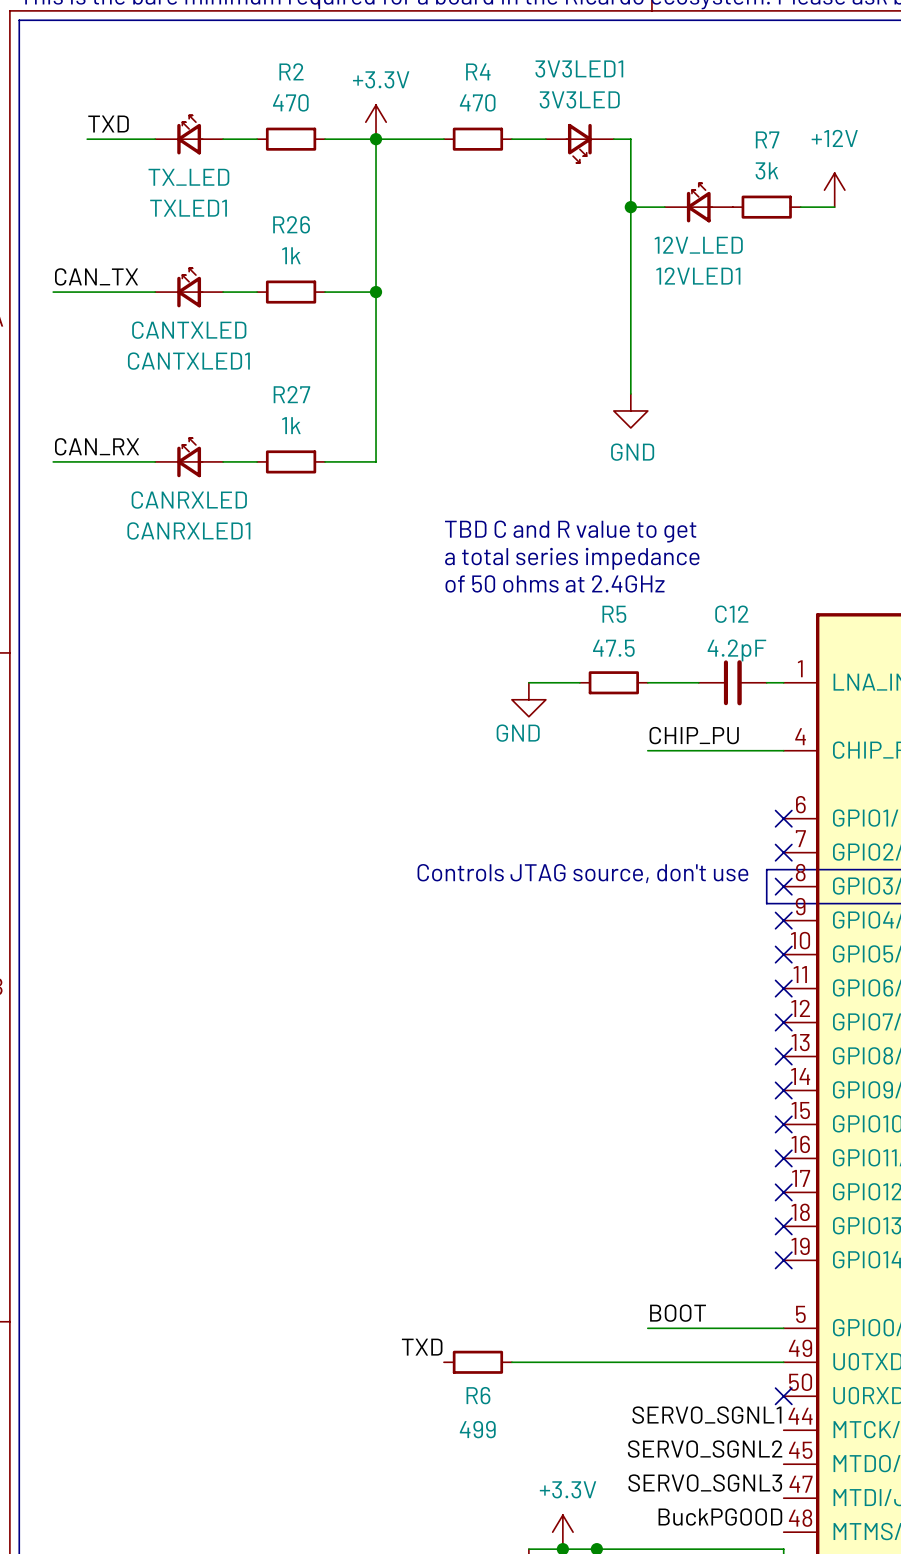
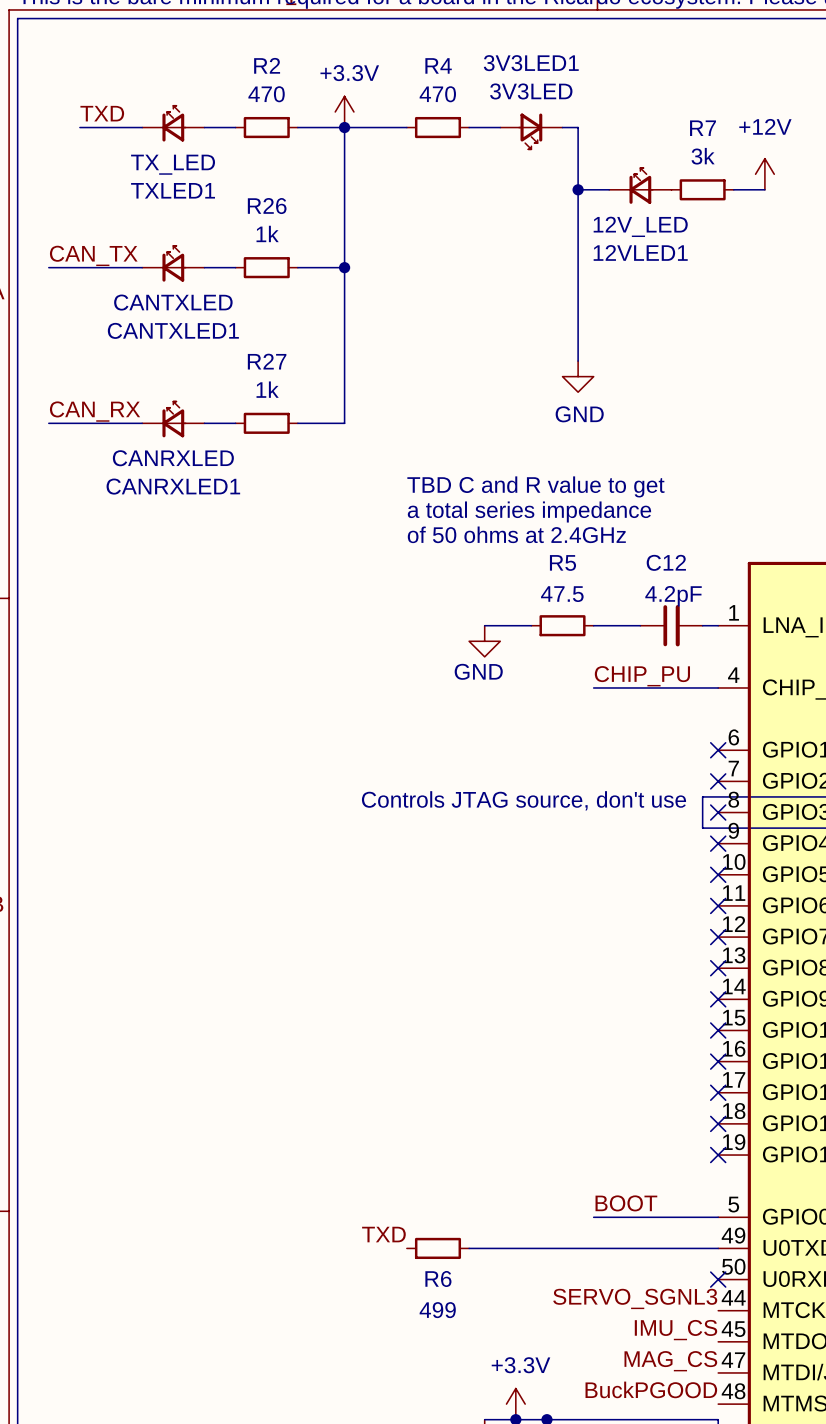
label: SERVO_SGNL1 (706, 1415) -> SERVO_SGNL3 (635, 1298)
label: SERVO_SGNL2 (705, 1449) -> IMU_CS (675, 1330)
label: SERVO_SGNL3 (705, 1483) -> MAG_CS (670, 1361)

